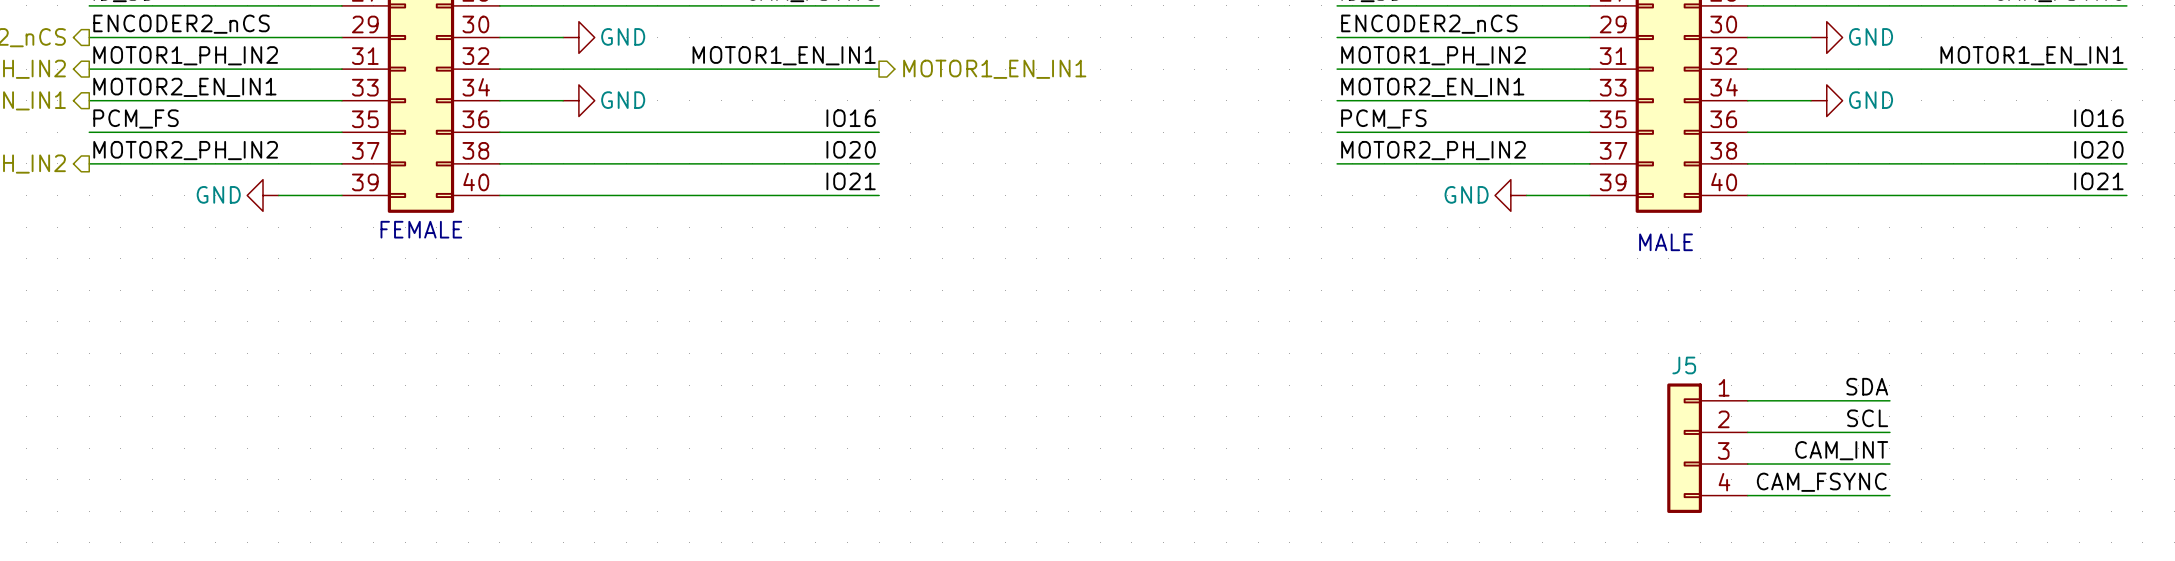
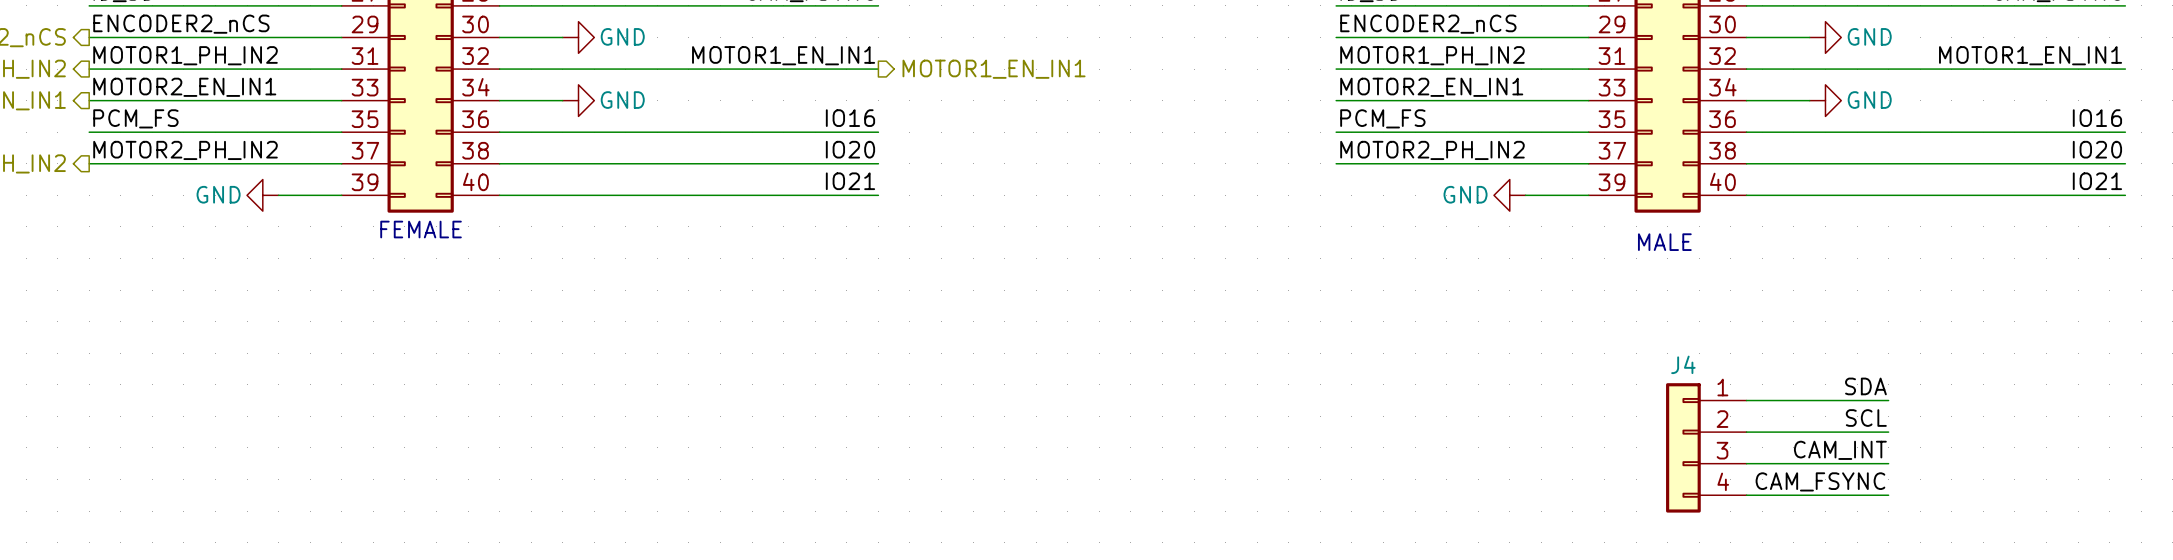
J5 name: J5 (1684, 365) -> J4 (1683, 364)

